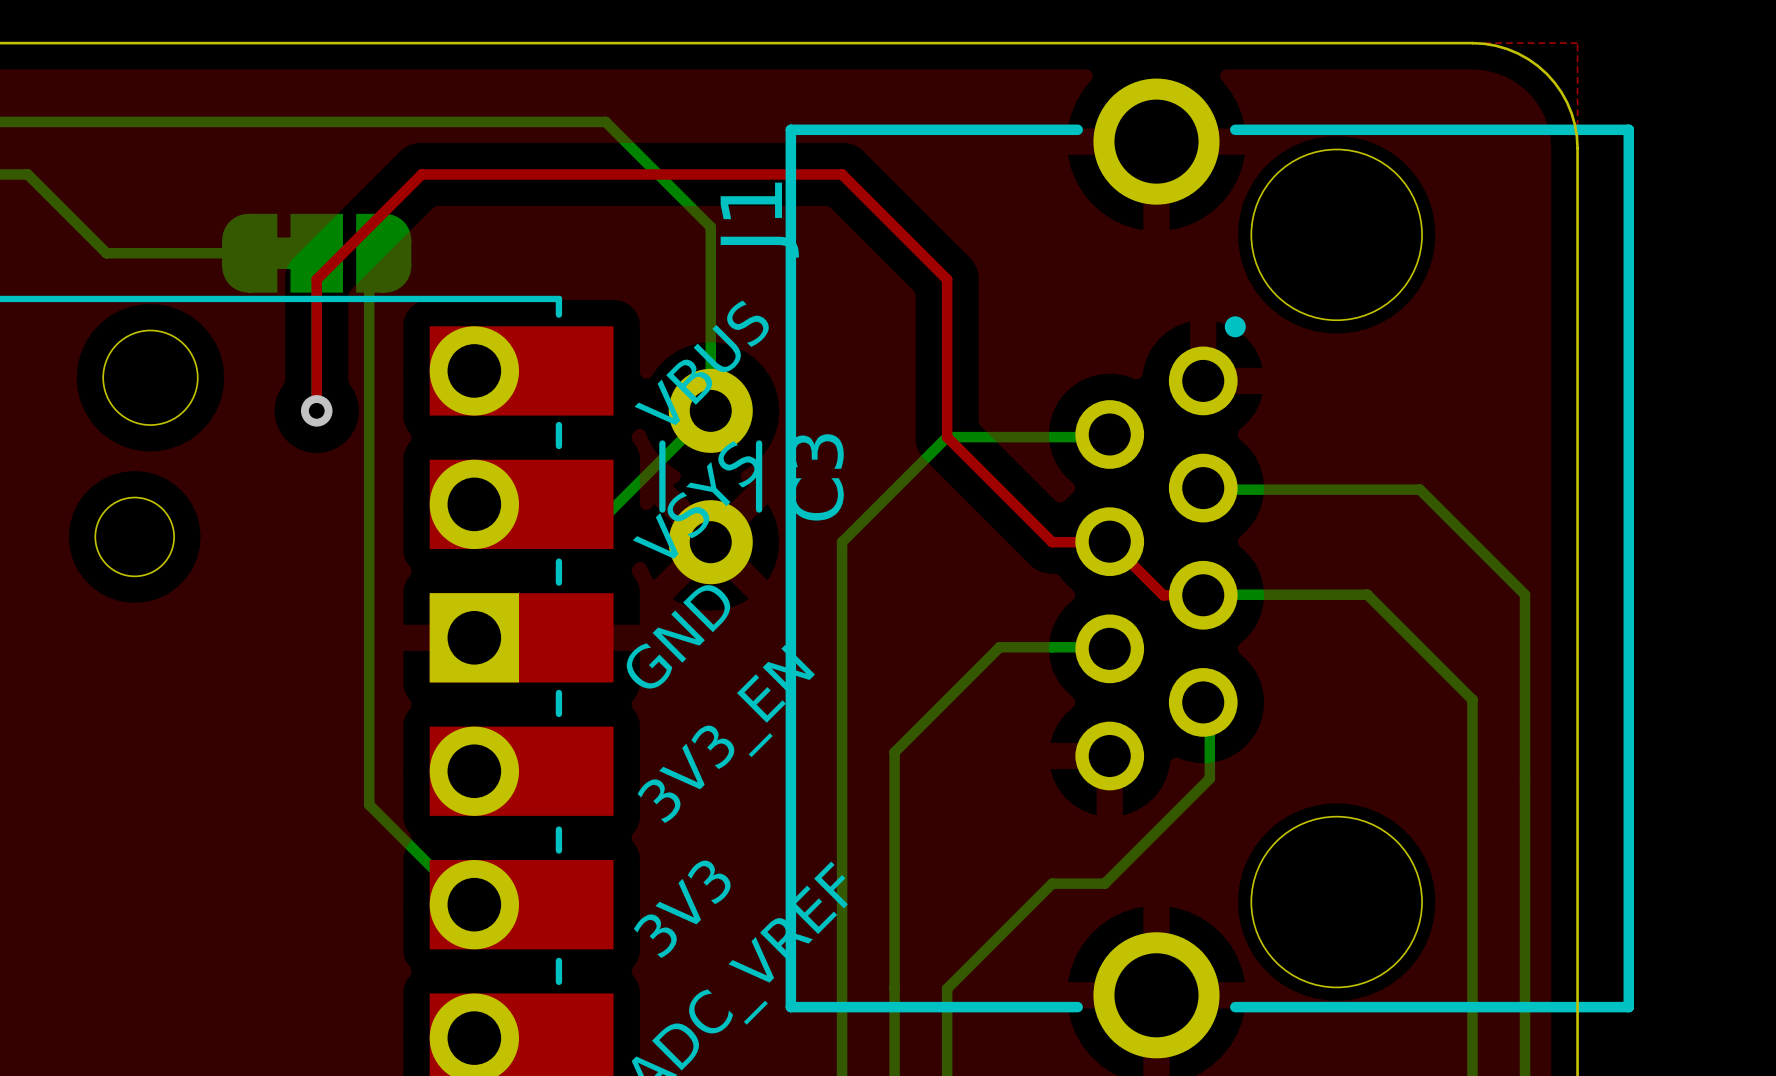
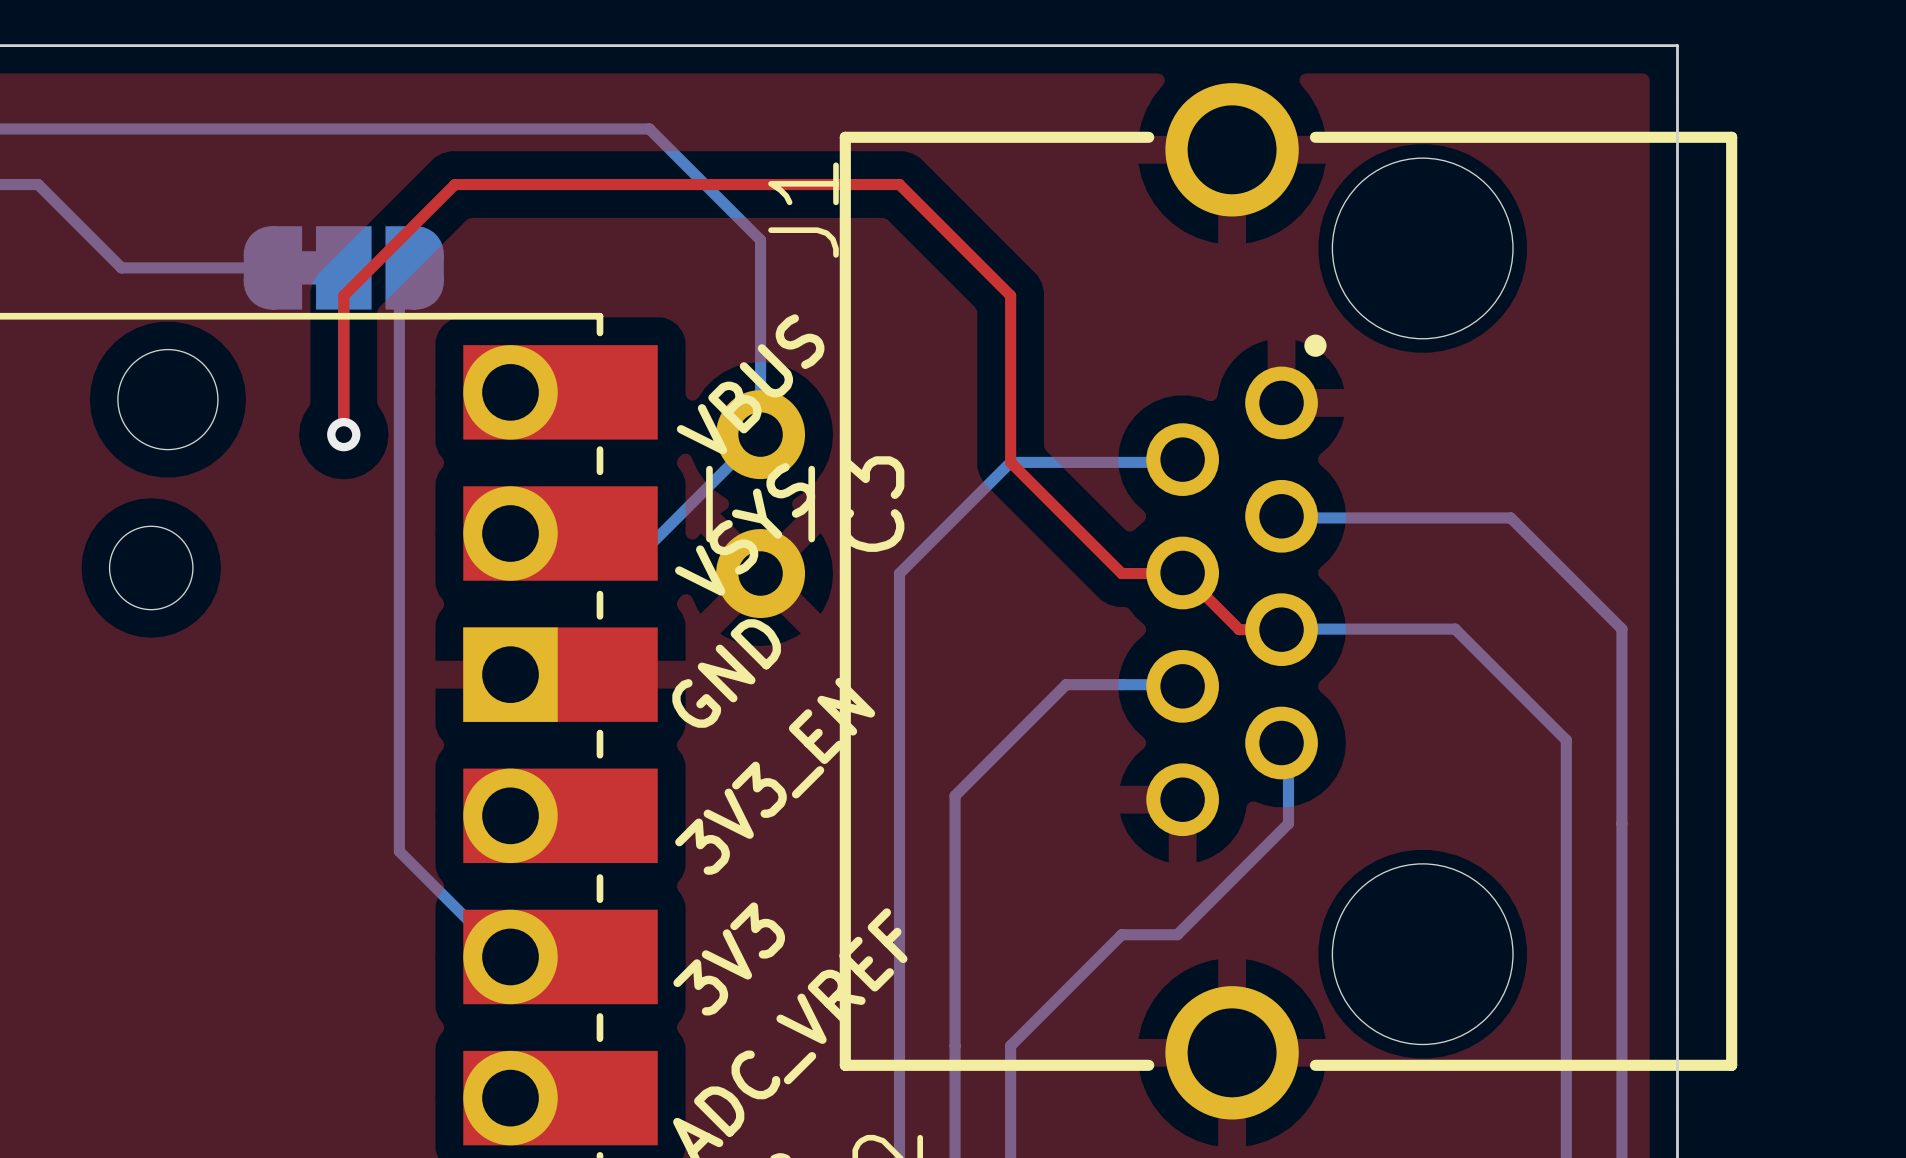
board edge: (1472, 43) (1507, 49) (1528, 59) (1546, 73) (1561, 92) (1571, 113) (1577, 148) -> (1566, 45) (1677, 45) (1677, 156)

